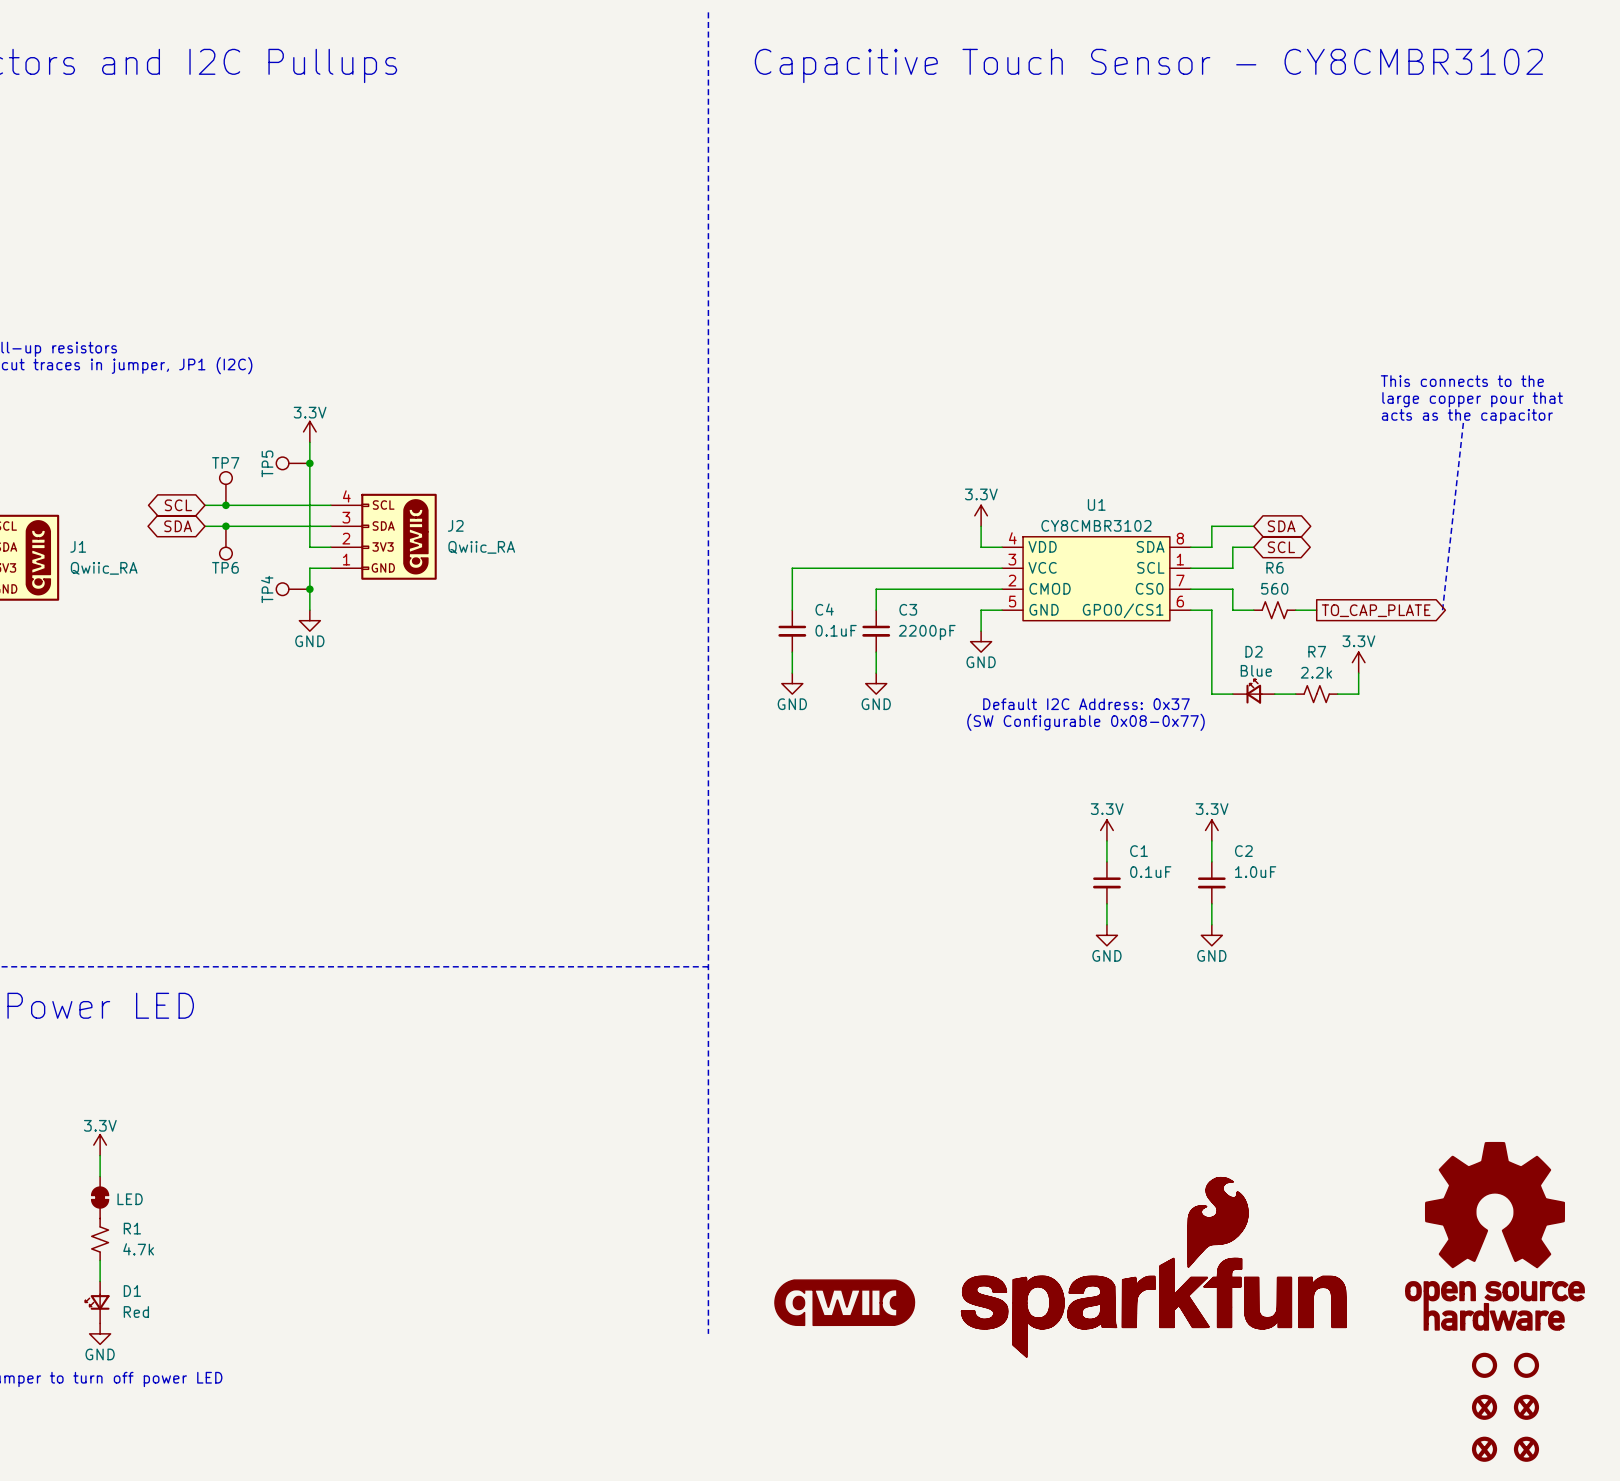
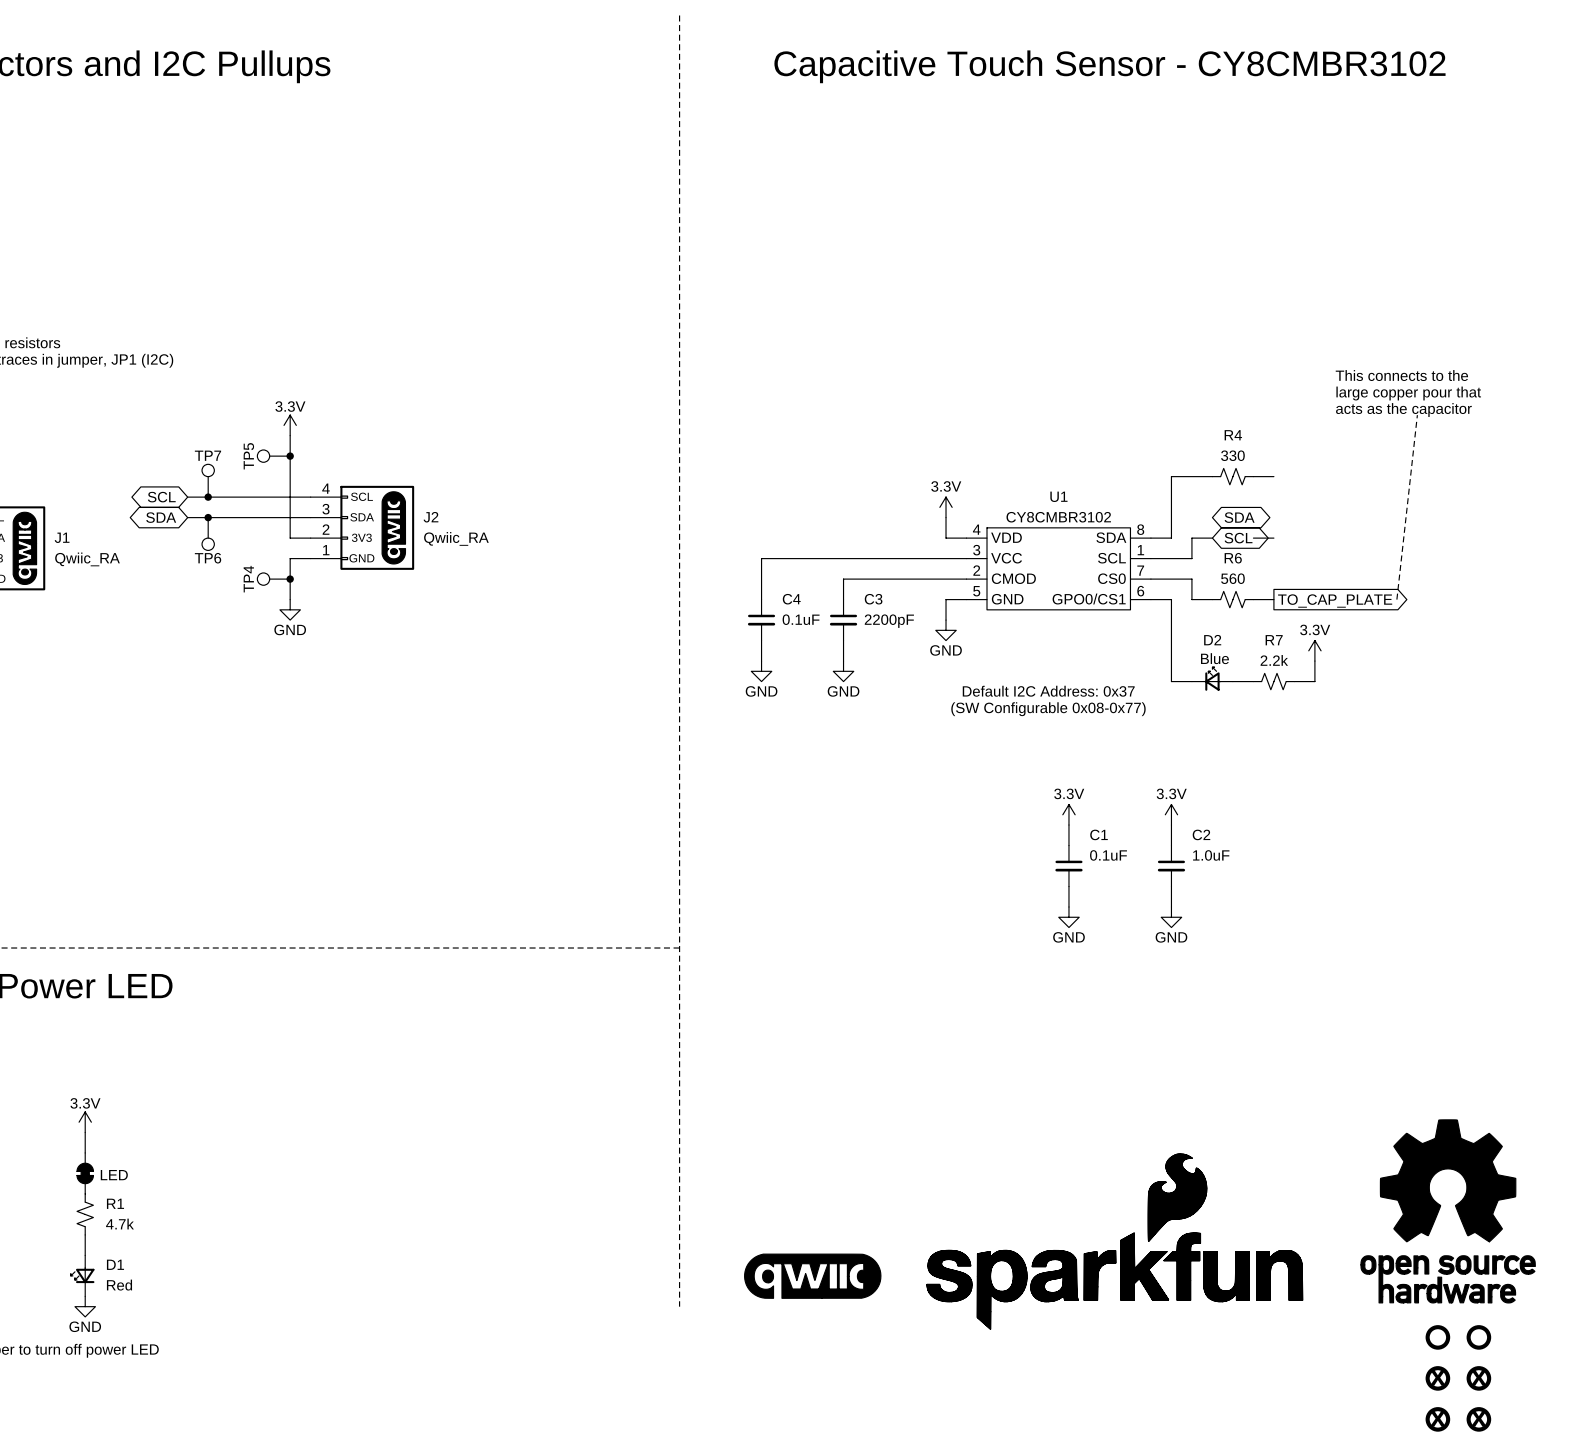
R4: none -> 330 (1232, 476)
wire: none -> (1253, 476) (1273, 476)
wire: (1211, 526) (1253, 526) -> (1171, 517) (1171, 476) (1212, 476)
wire: none -> (1253, 538) (1273, 538)

